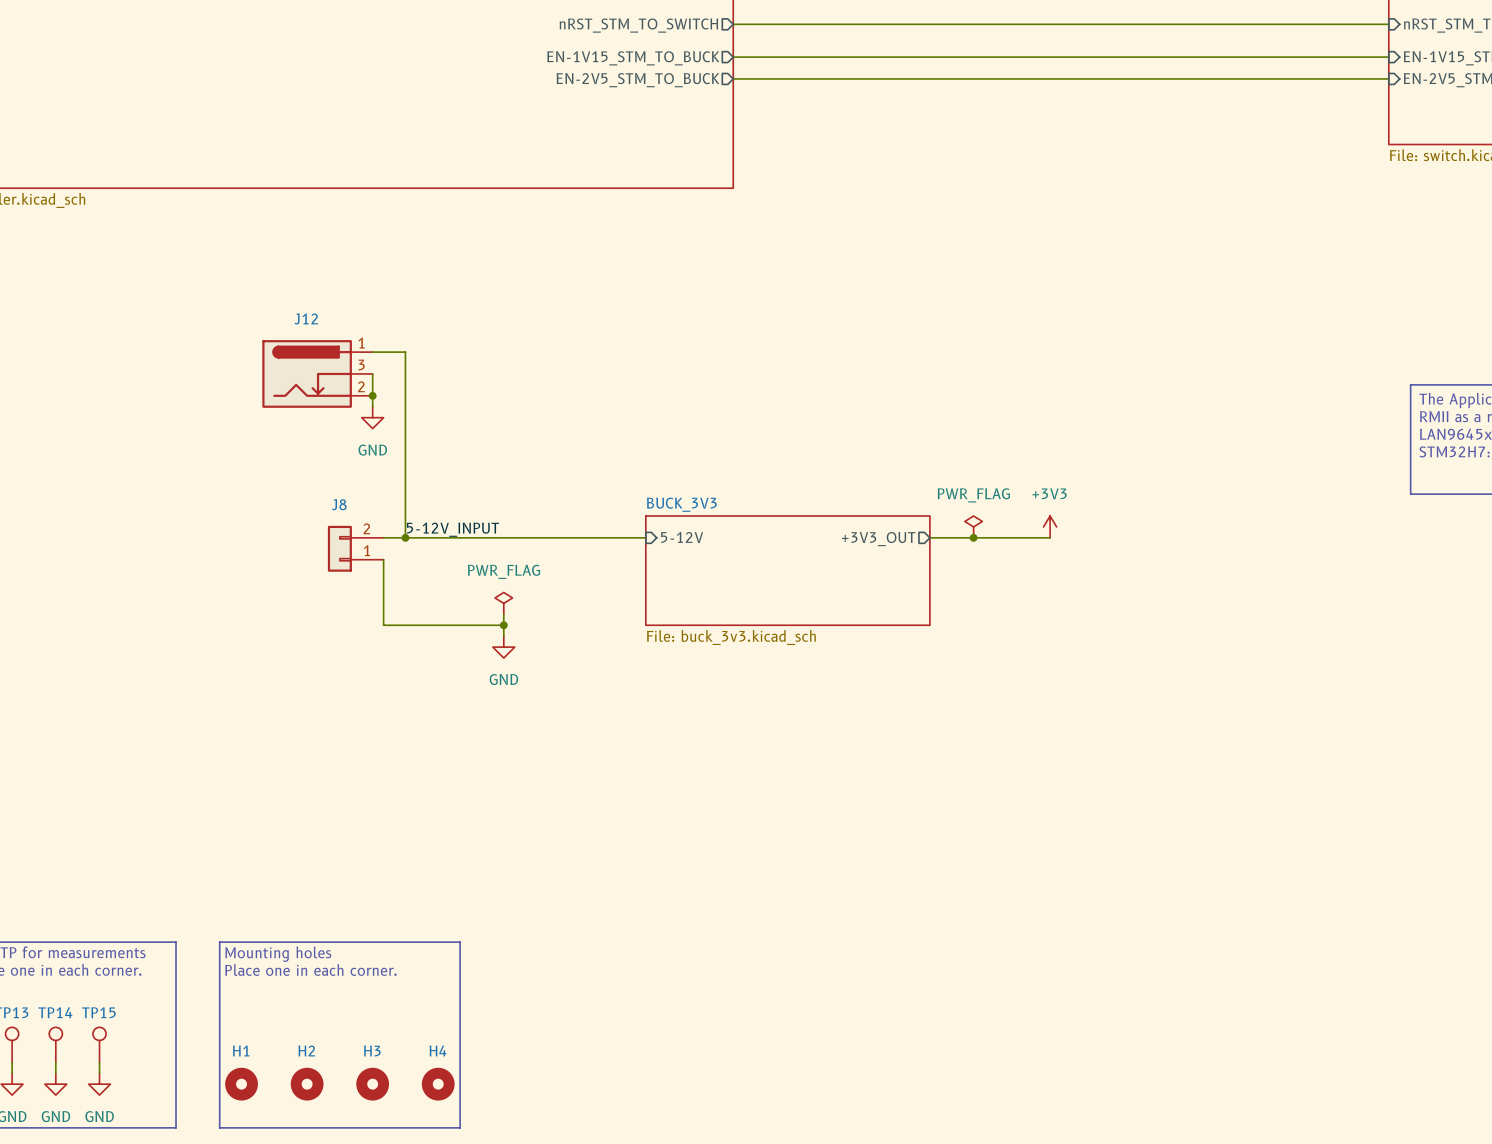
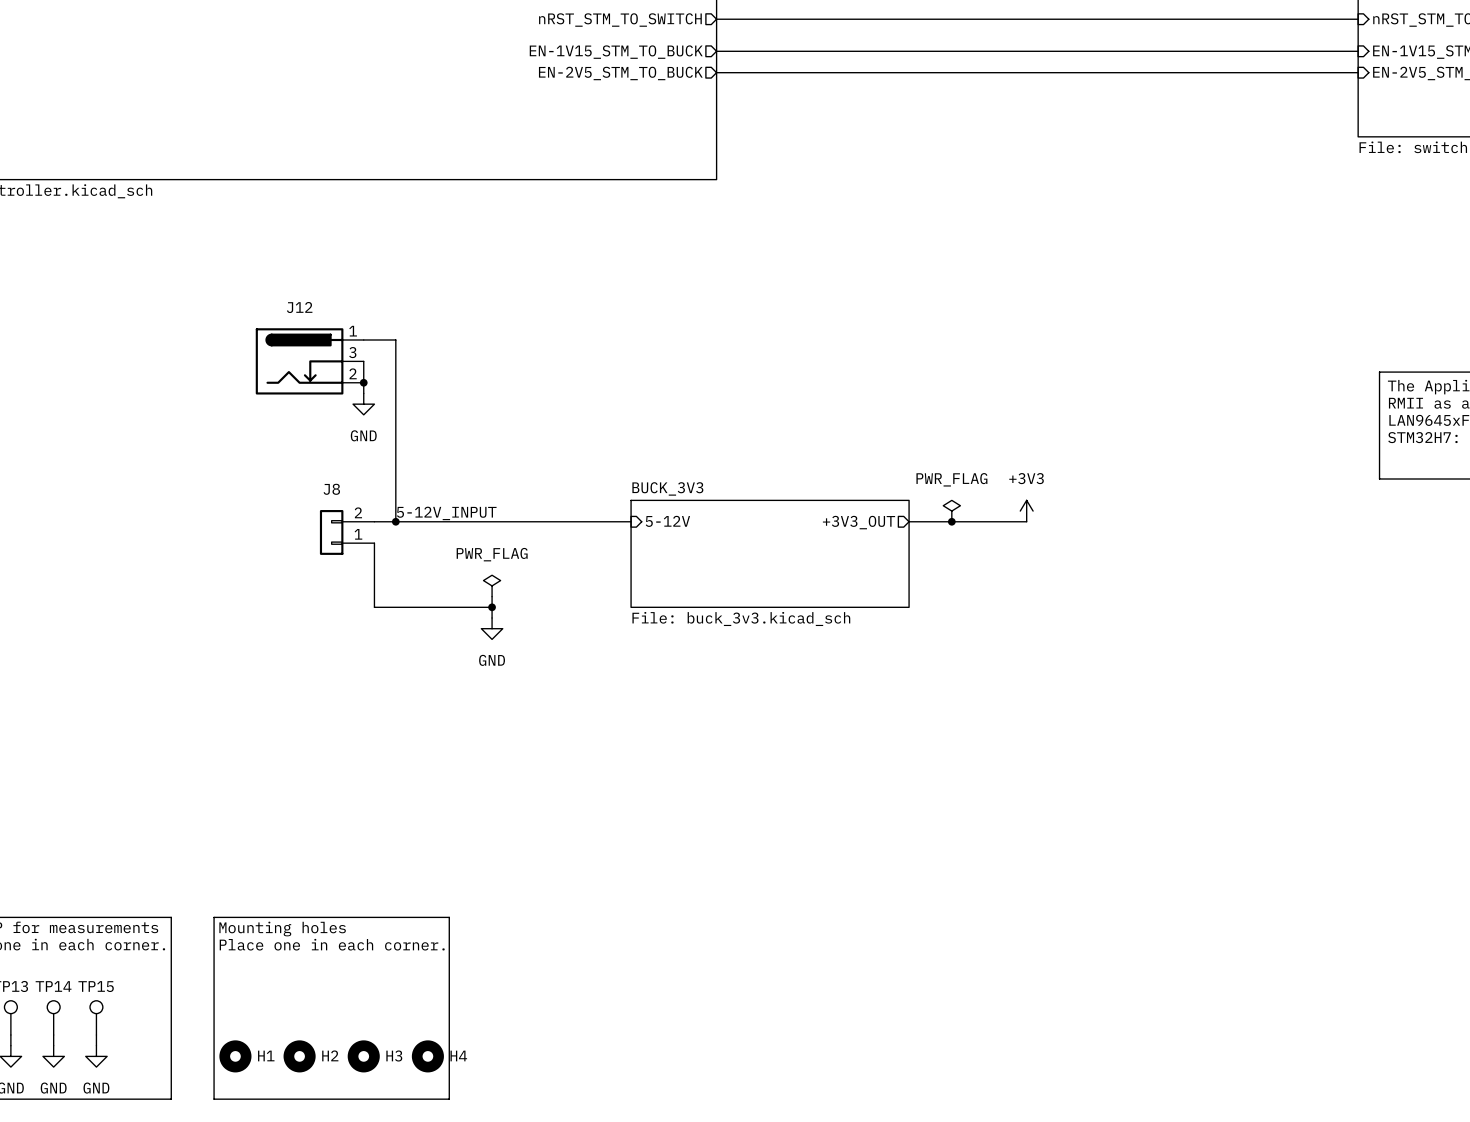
H1 name position: H1 (241, 1050) -> H1 (266, 1055)
H2 name position: H2 (306, 1050) -> H2 (330, 1055)
H3 name position: H3 (372, 1050) -> H3 (394, 1055)
H4 name position: H4 (438, 1050) -> H4 (458, 1055)

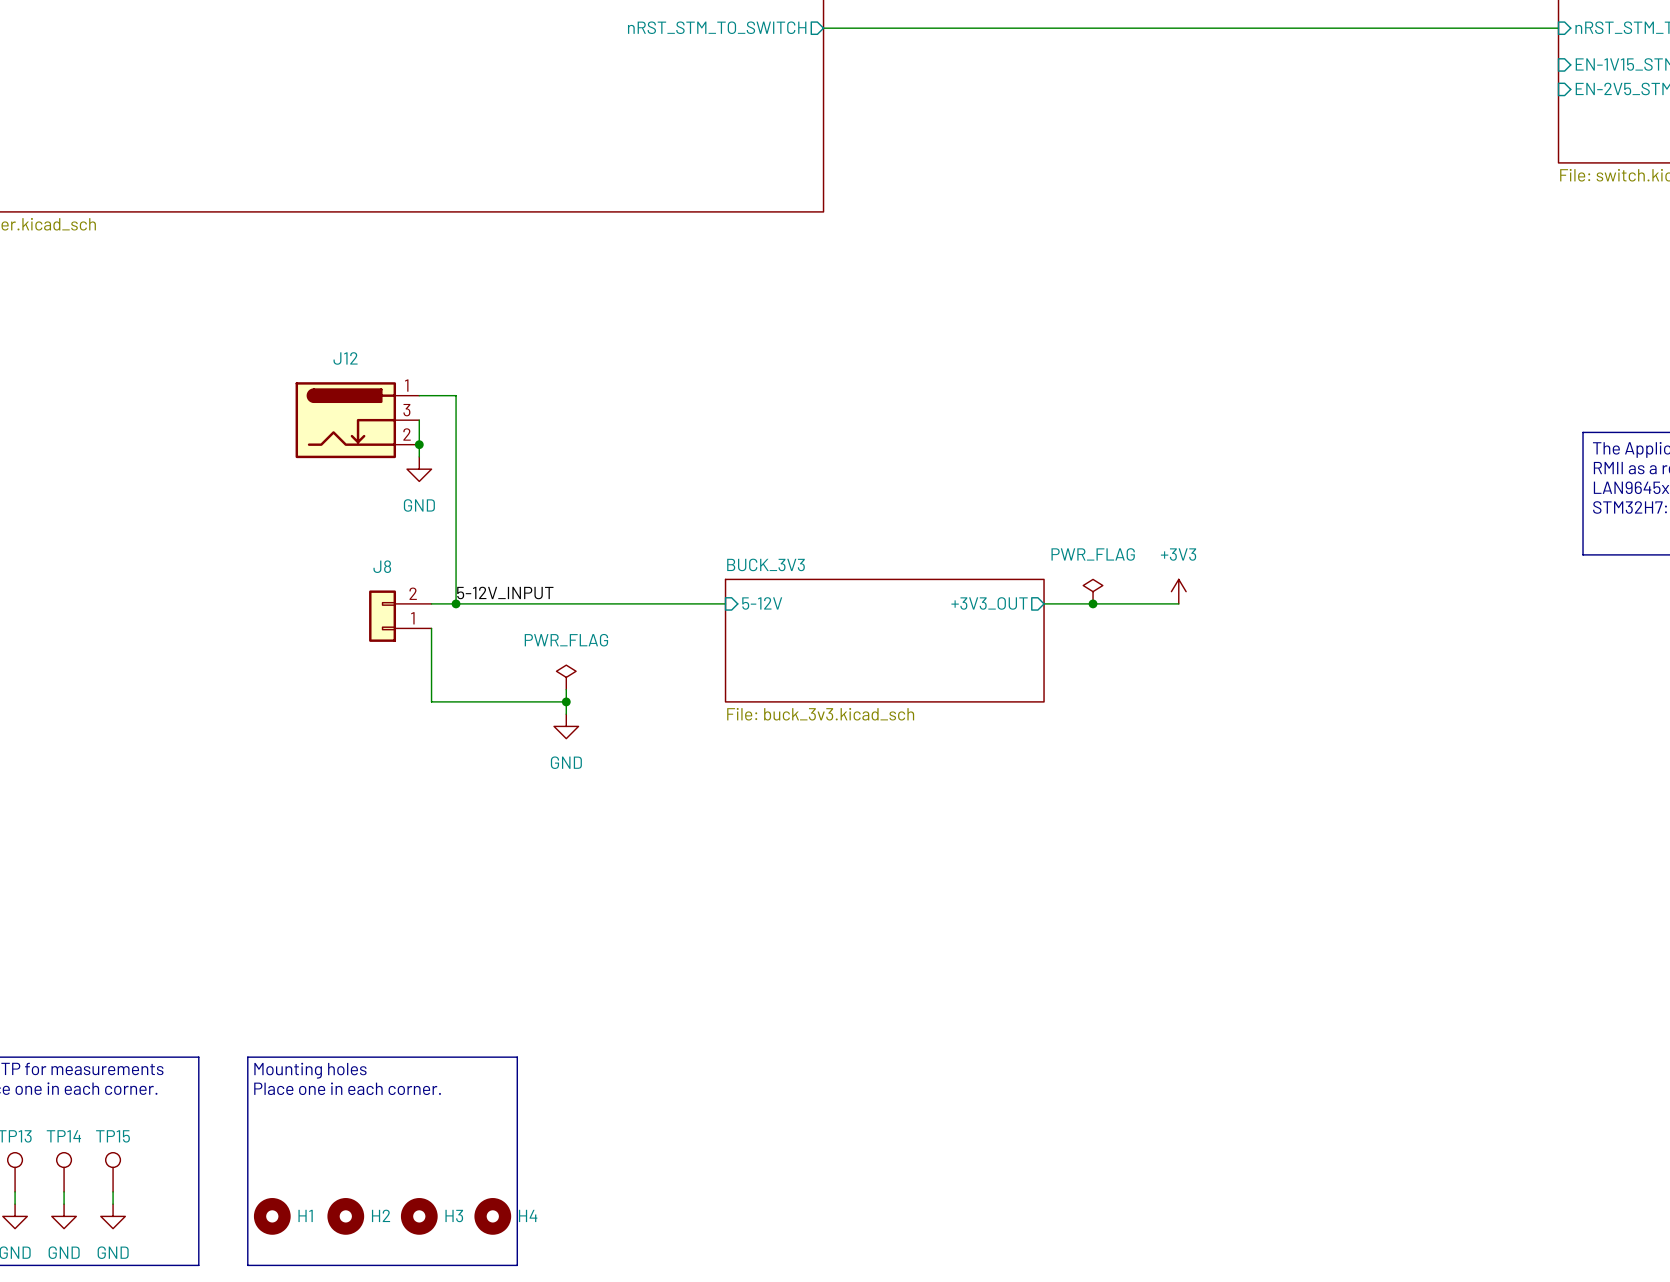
wire: (716, 51) (1358, 51) -> none
sheet pin: EN-1V15_STM_TO_BUCK (616, 52) -> none
wire: (716, 72) (1358, 72) -> none
sheet pin: EN-2V5_STM_TO_BUCK (620, 73) -> none

